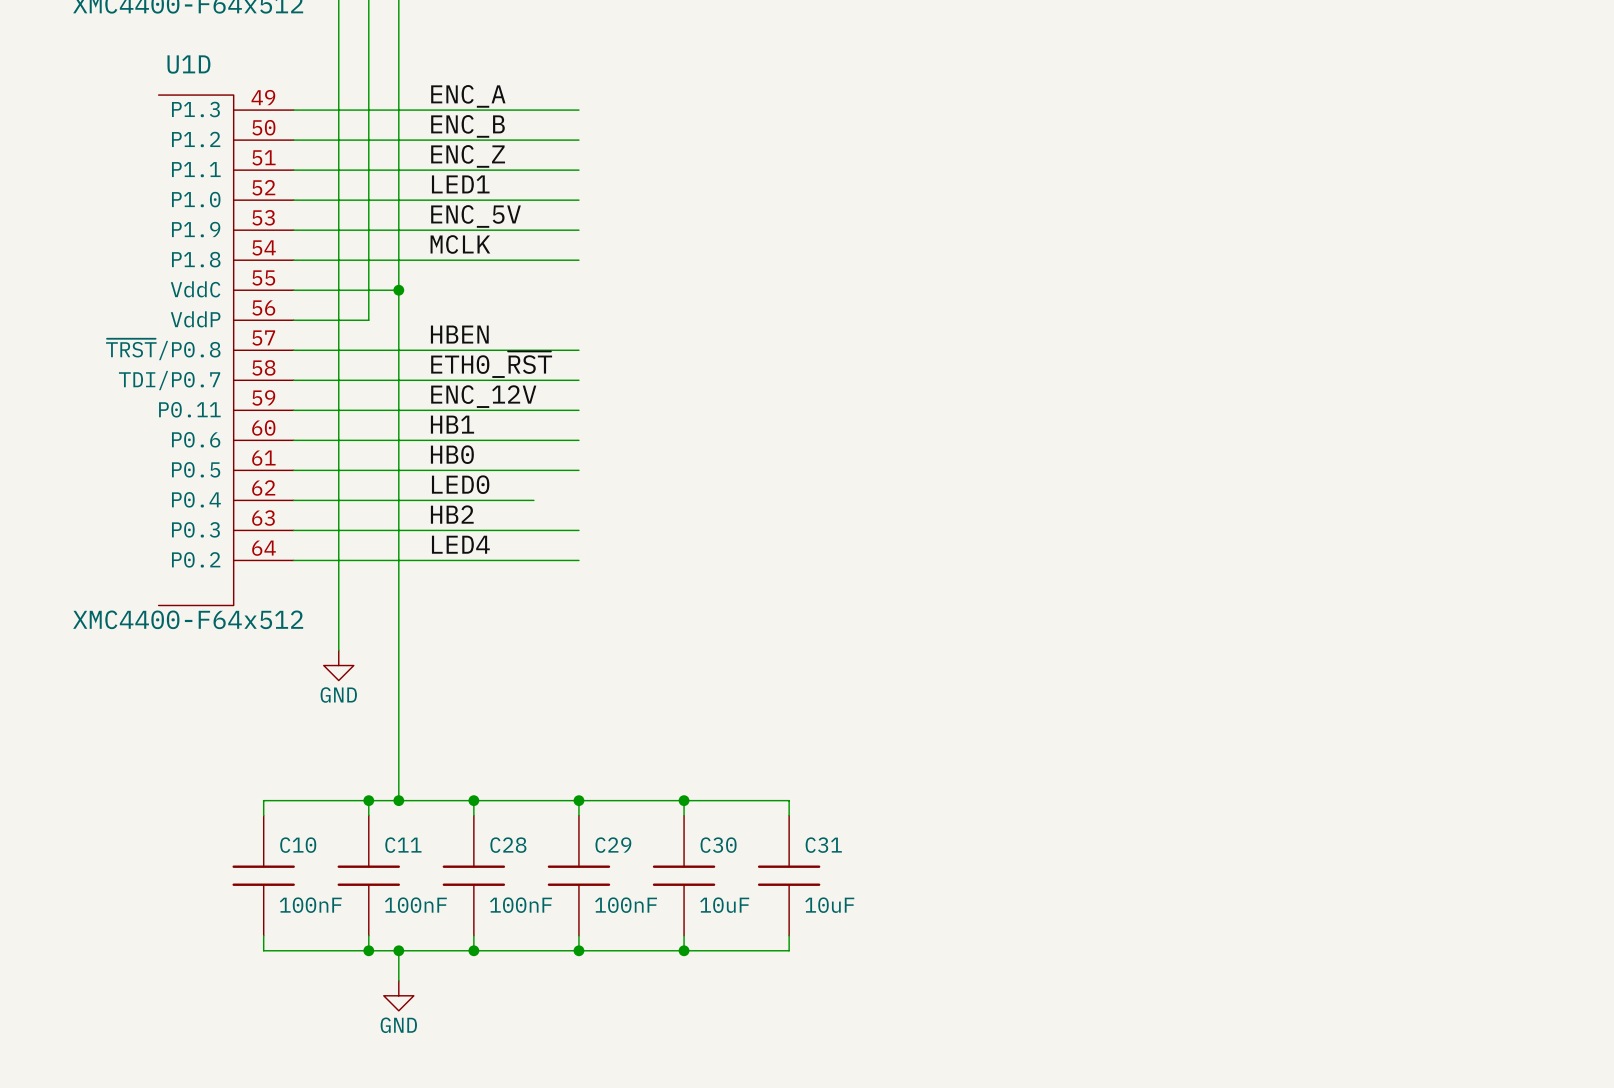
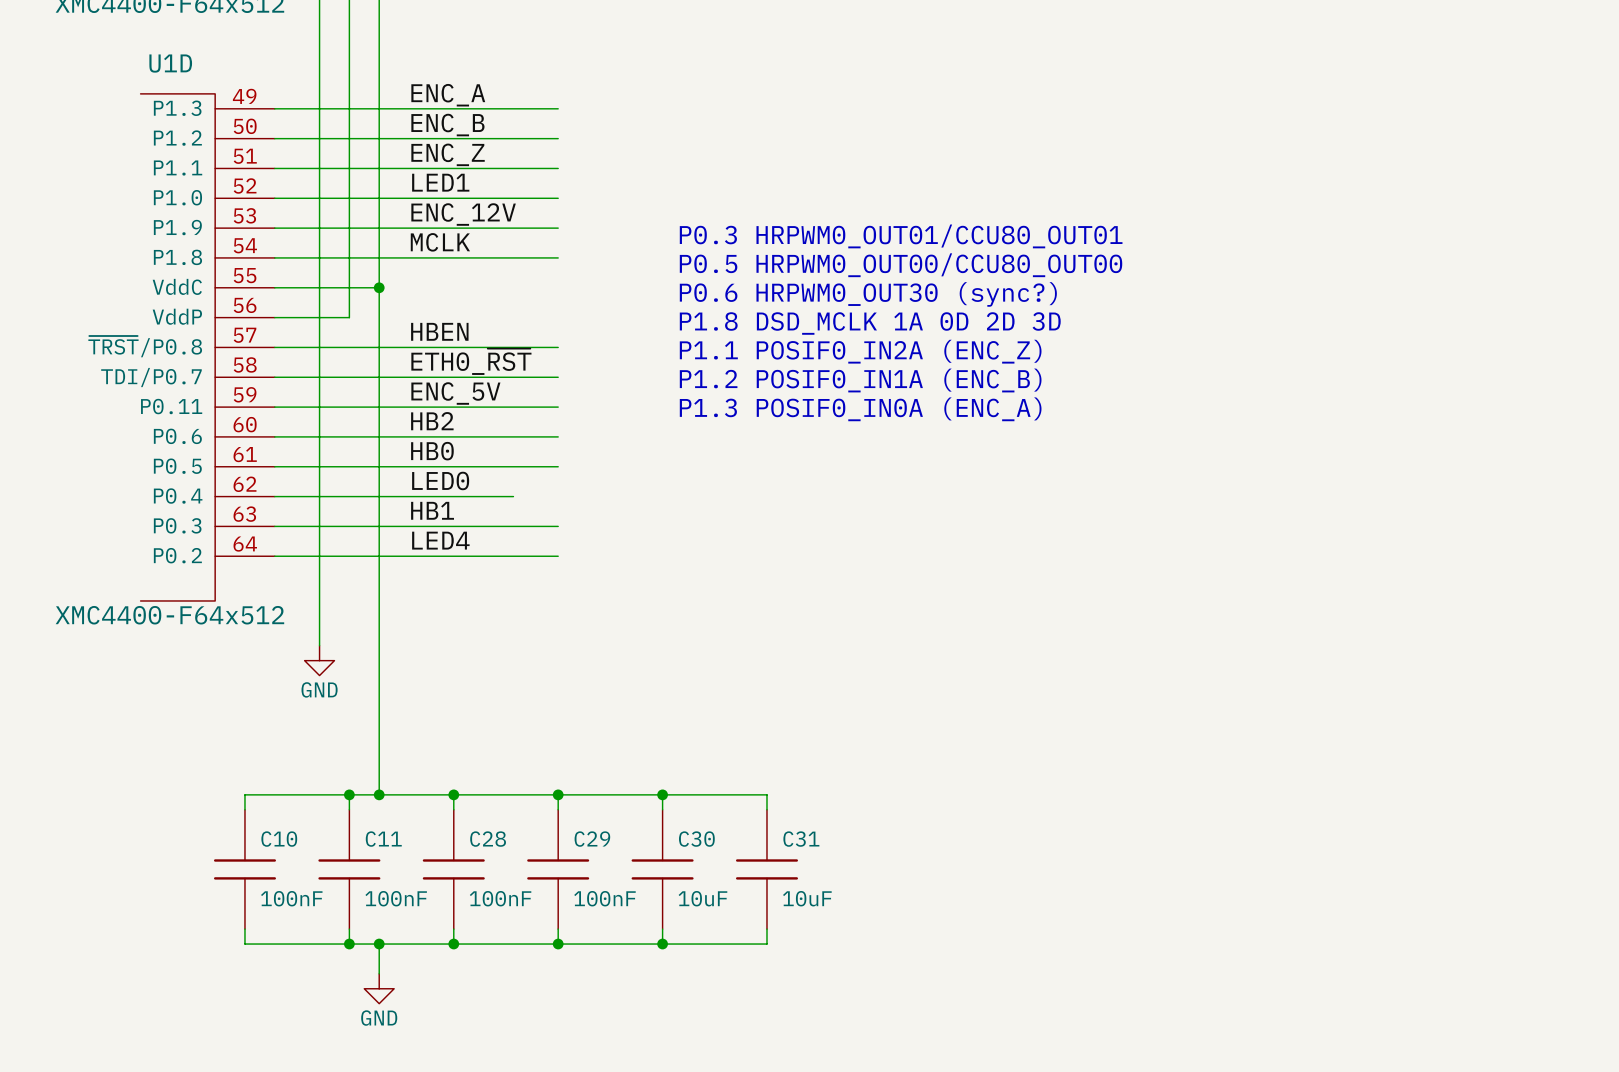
label: ENC_5V (475, 216) -> ENC_12V (463, 214)
text: none -> P0.3 HRPWM0_OUT01/CCU80_OUT01 (901, 236)
text: none -> P0.5 HRPWM0_OUT00/CCU80_OUT00 (901, 265)
text: none -> P0.6 HRPWM0_OUT30 (sync?) (868, 294)
text: none -> P1.8 DSD_MCLK 1A 0D 2D 3D (870, 323)
text: none -> P1.1 POSIF0_IN2A (ENC_Z) (860, 351)
text: none -> P1.2 POSIF0_IN1A (ENC_B) (860, 380)
label: ENC_12V (483, 396) -> ENC_5V (455, 393)
text: none -> P1.3 POSIF0_IN0A (ENC_A) (860, 409)
label: HB1 (452, 424) -> HB2 (432, 421)
label: HB2 (452, 514) -> HB1 (432, 510)

